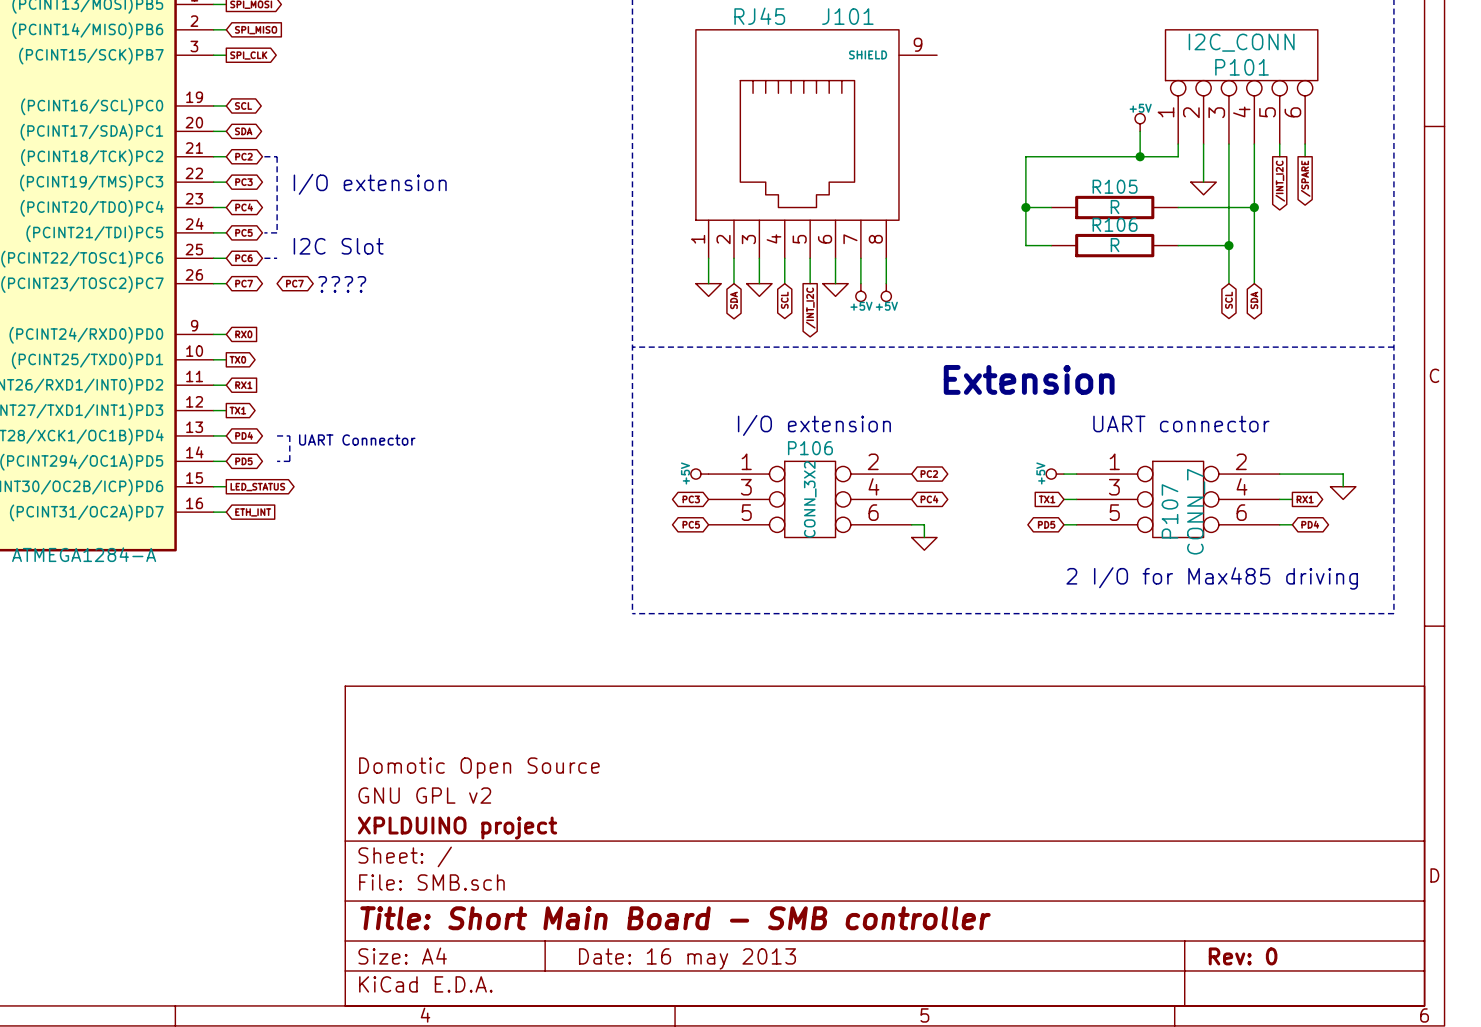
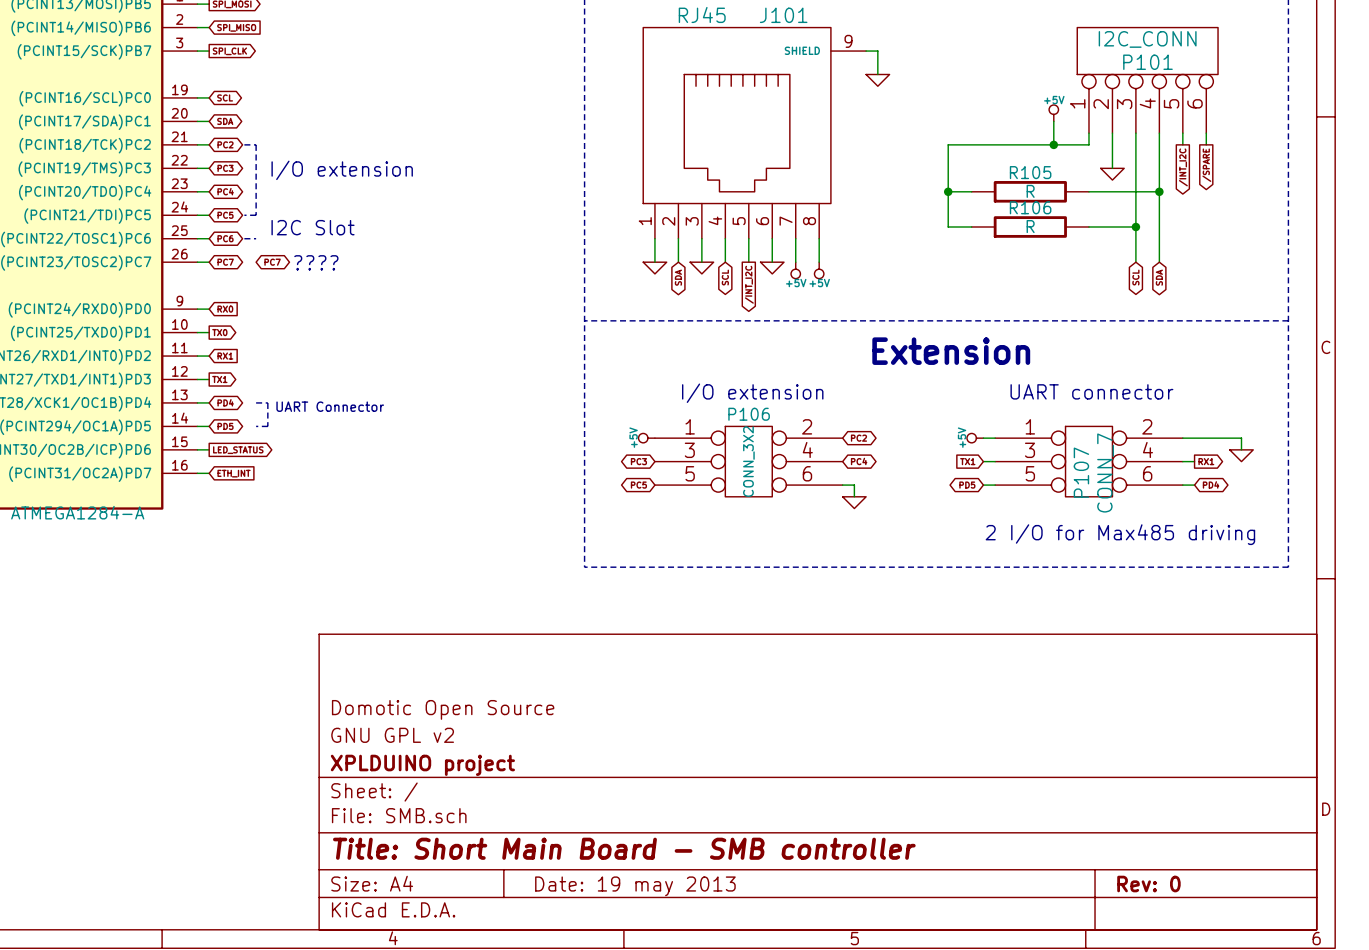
wire: none -> (866, 51) (877, 51) (877, 74)
power symbol: none -> (877, 80)
title block: Date: 16 may 2013 (687, 958) -> Date: 19 may 2013 (635, 886)

